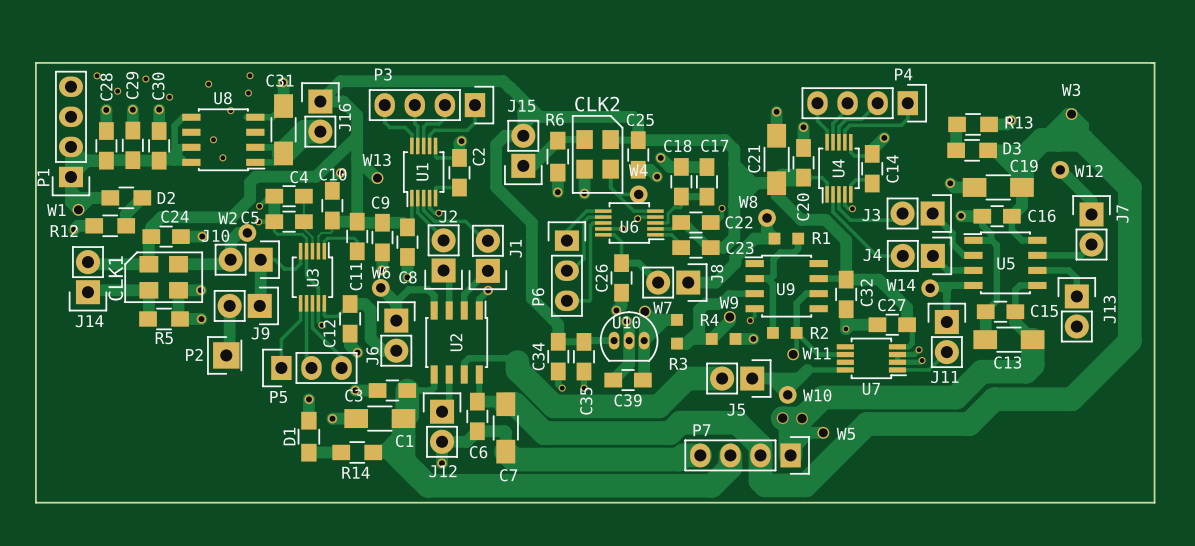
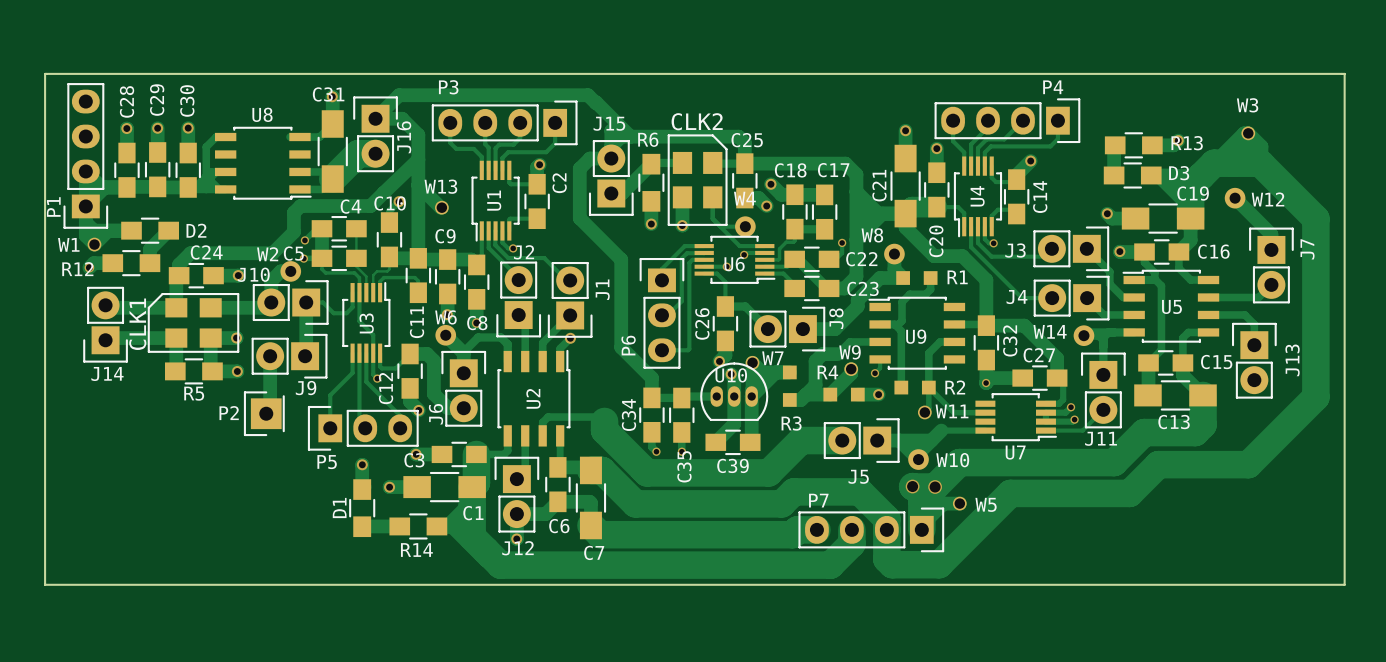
via: (97, 75) -> none
via: (250, 75) -> none
via: (145, 79) -> none
via: (208, 84) -> none
via: (117, 91) -> none
via: (248, 93) -> none
via: (169, 97) -> none
via: (230, 110) -> none
via: (213, 139) -> none
via: (222, 157) -> none

